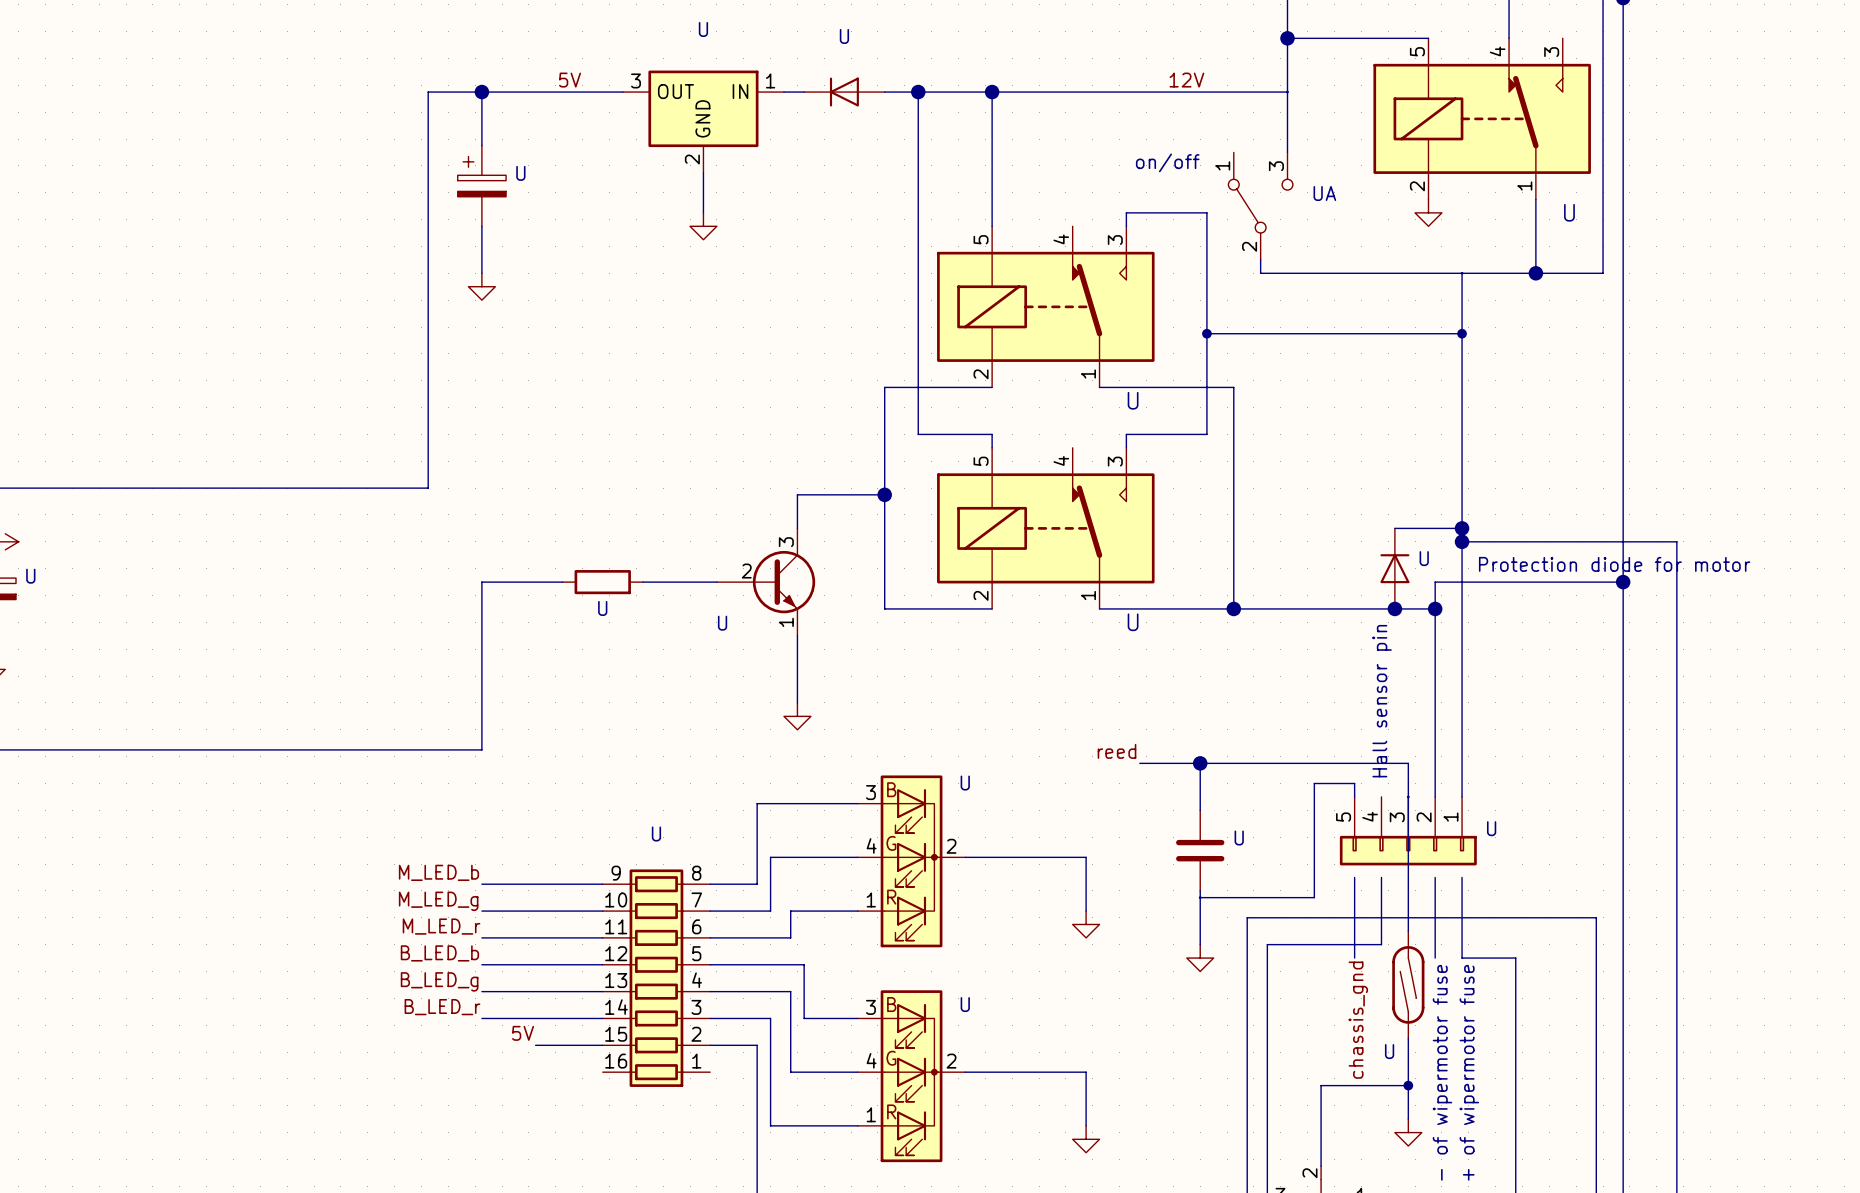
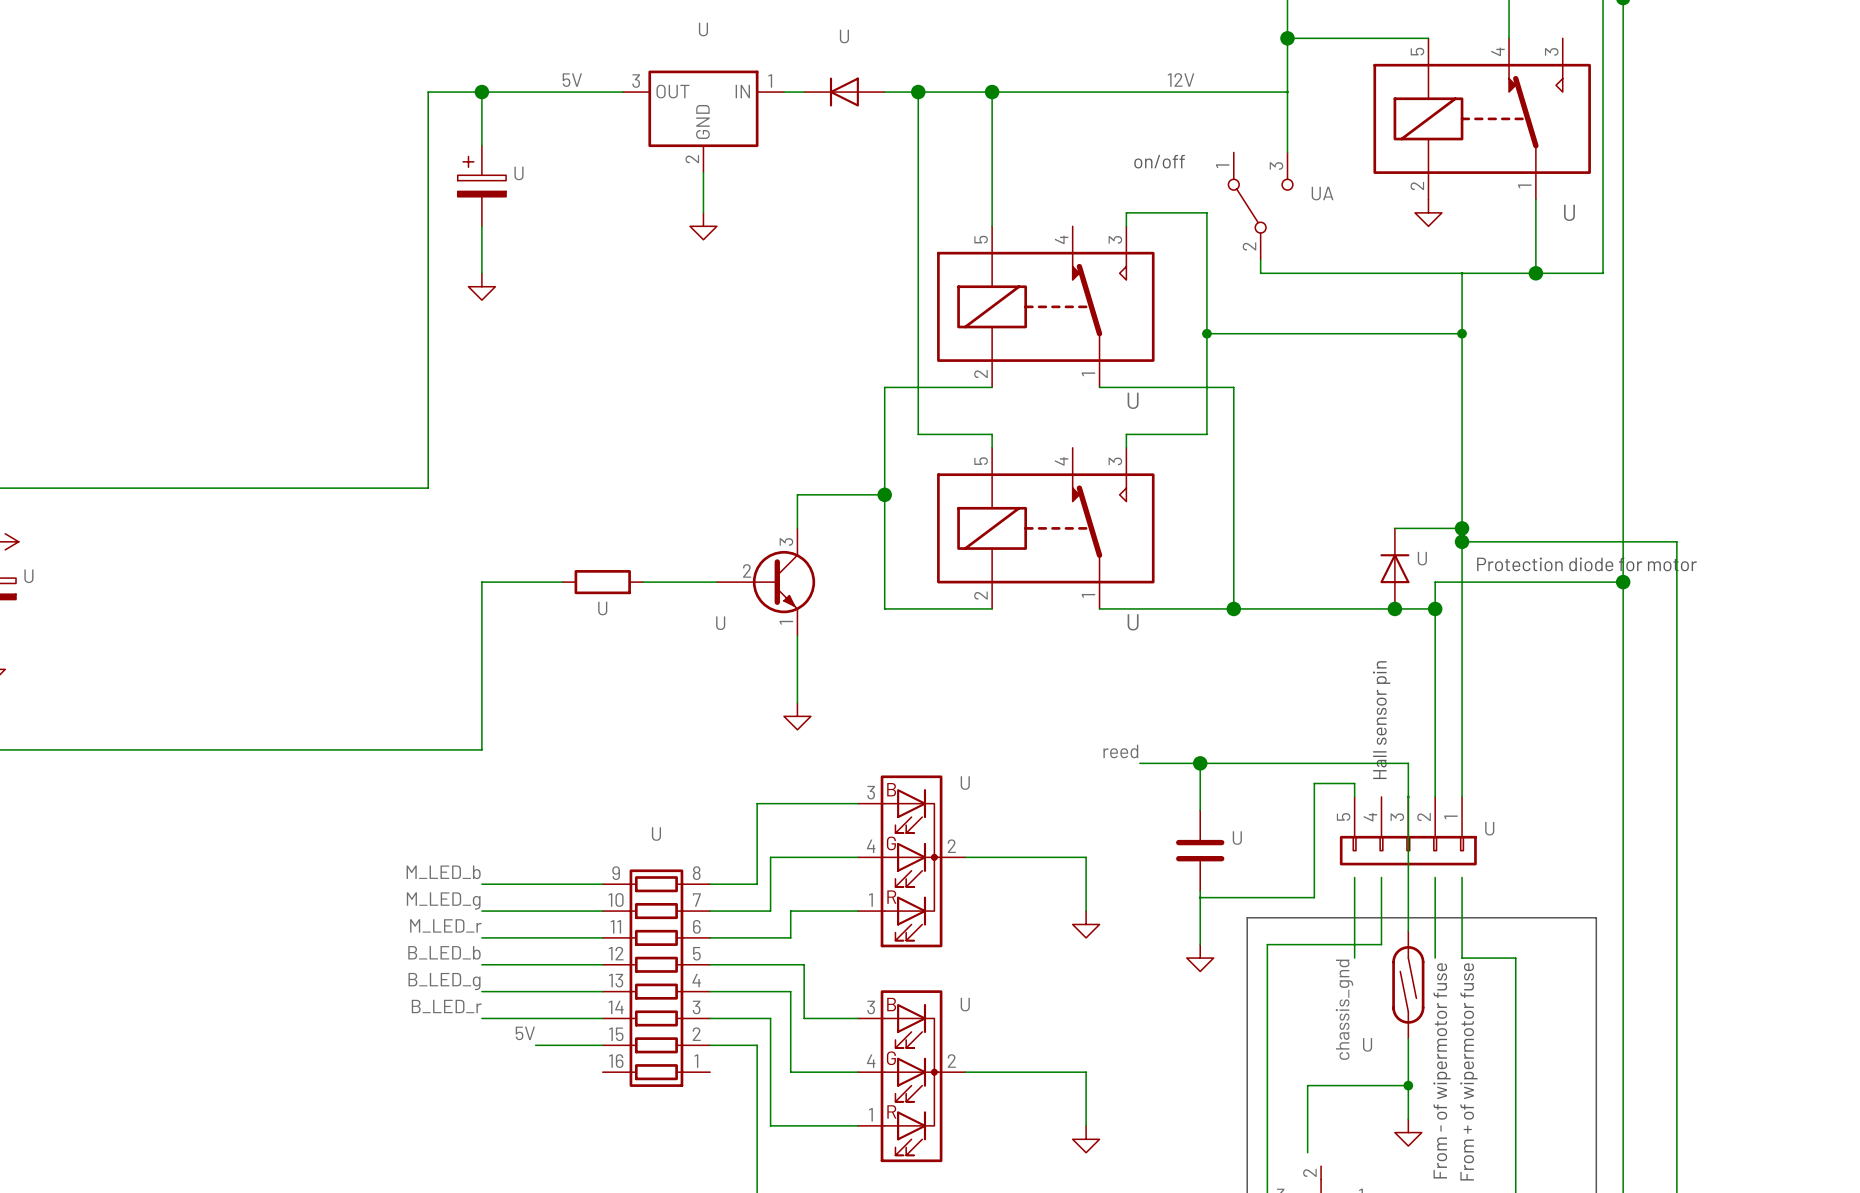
label position: chassis_gnd (1358, 1020) -> chassis_gnd (1344, 1009)
U name position: U (1389, 1051) -> U (1367, 1044)
wire: (1321, 1085) (1321, 1166) -> (1321, 1085) (1307, 1085) (1307, 1152)

